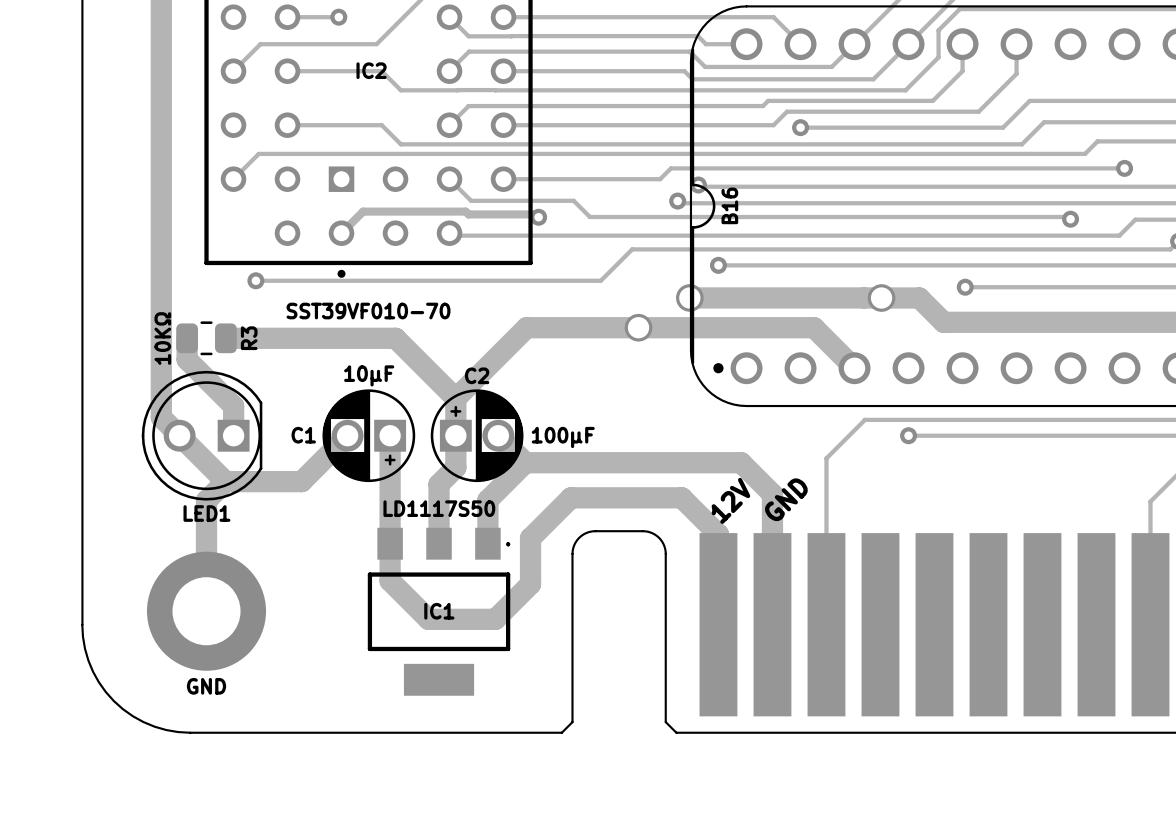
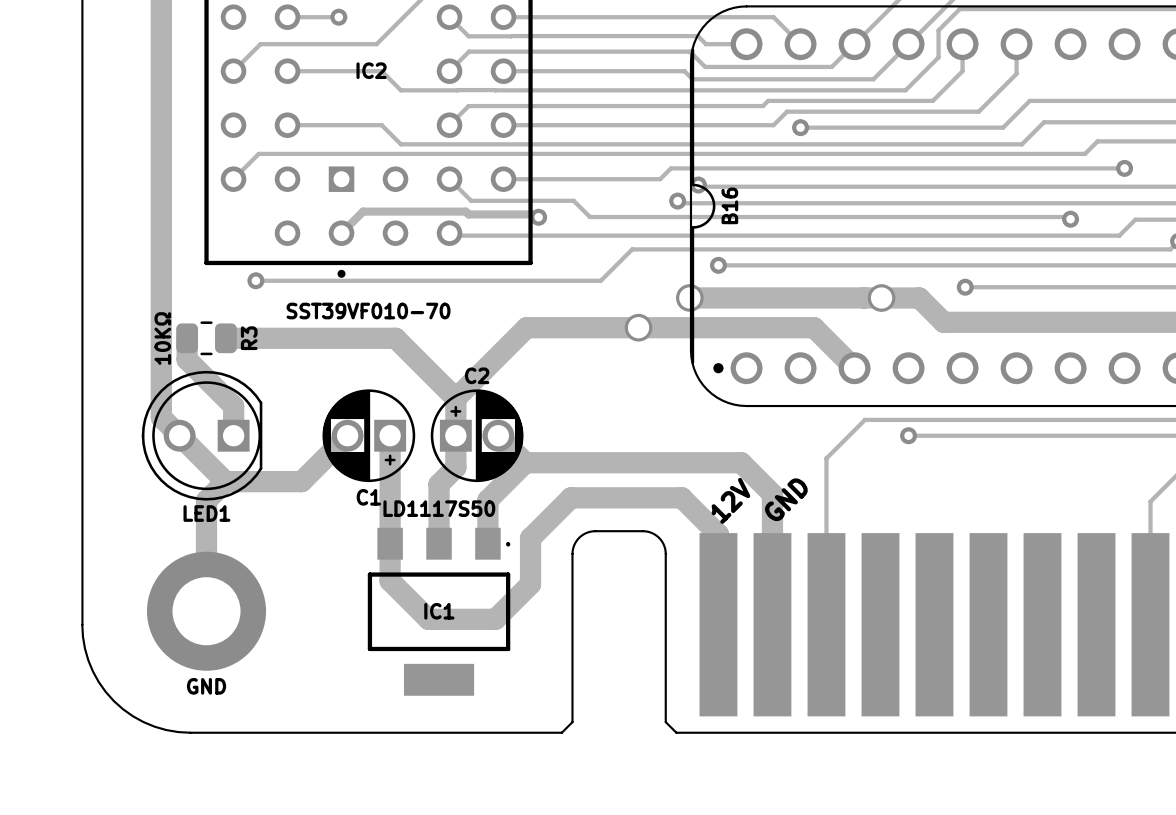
C1 value: 10μF (369, 375) -> none
C1 name position: C1 (303, 435) -> C1 (368, 497)
C2 value: 100μF (563, 437) -> none

